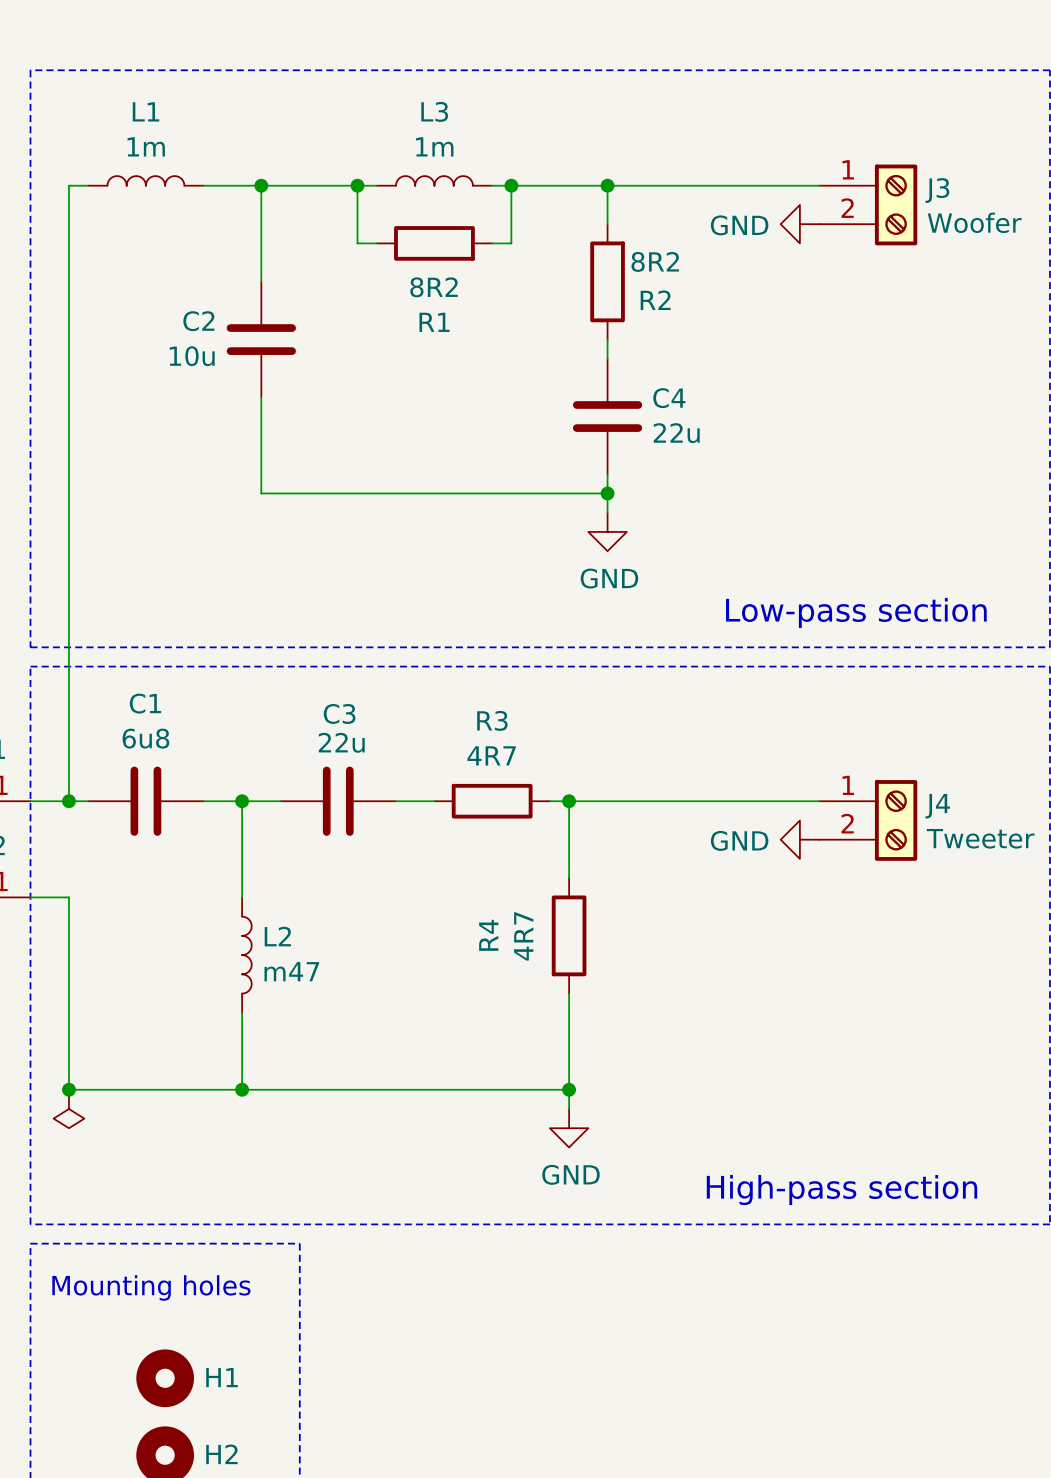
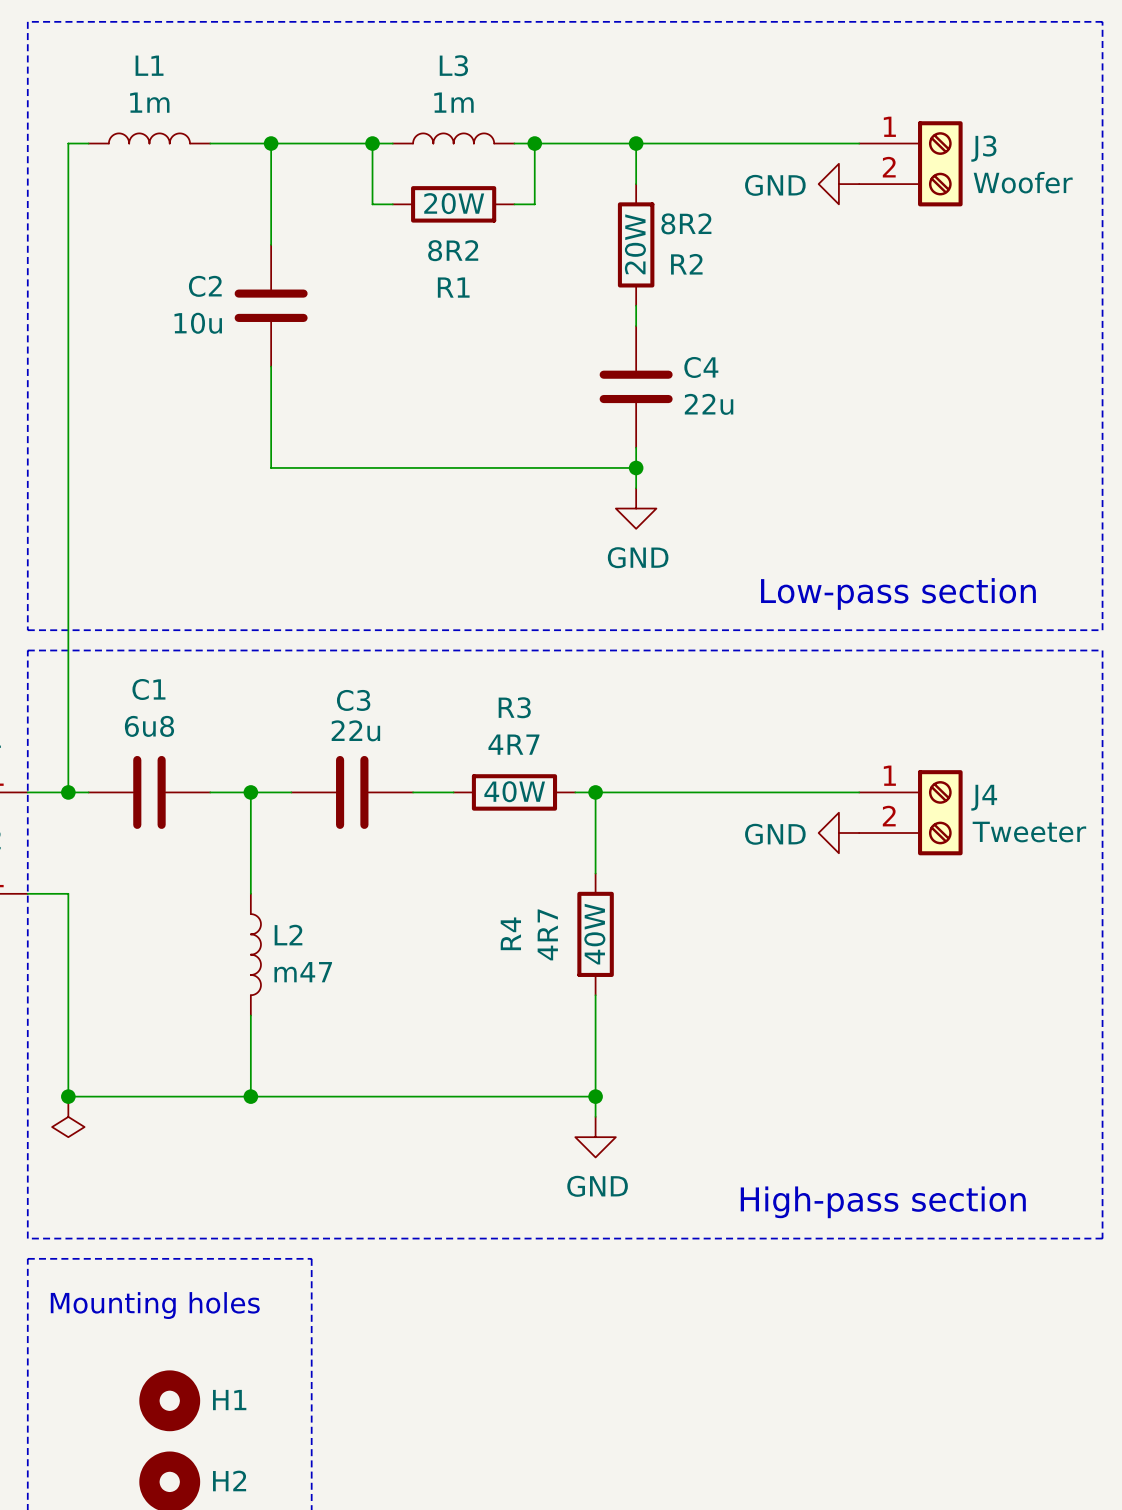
R1 text: none -> 20W (454, 203)
R2 text: none -> 20W (635, 244)
R3 text: none -> 40W (514, 791)
R4 text: none -> 40W (594, 934)

